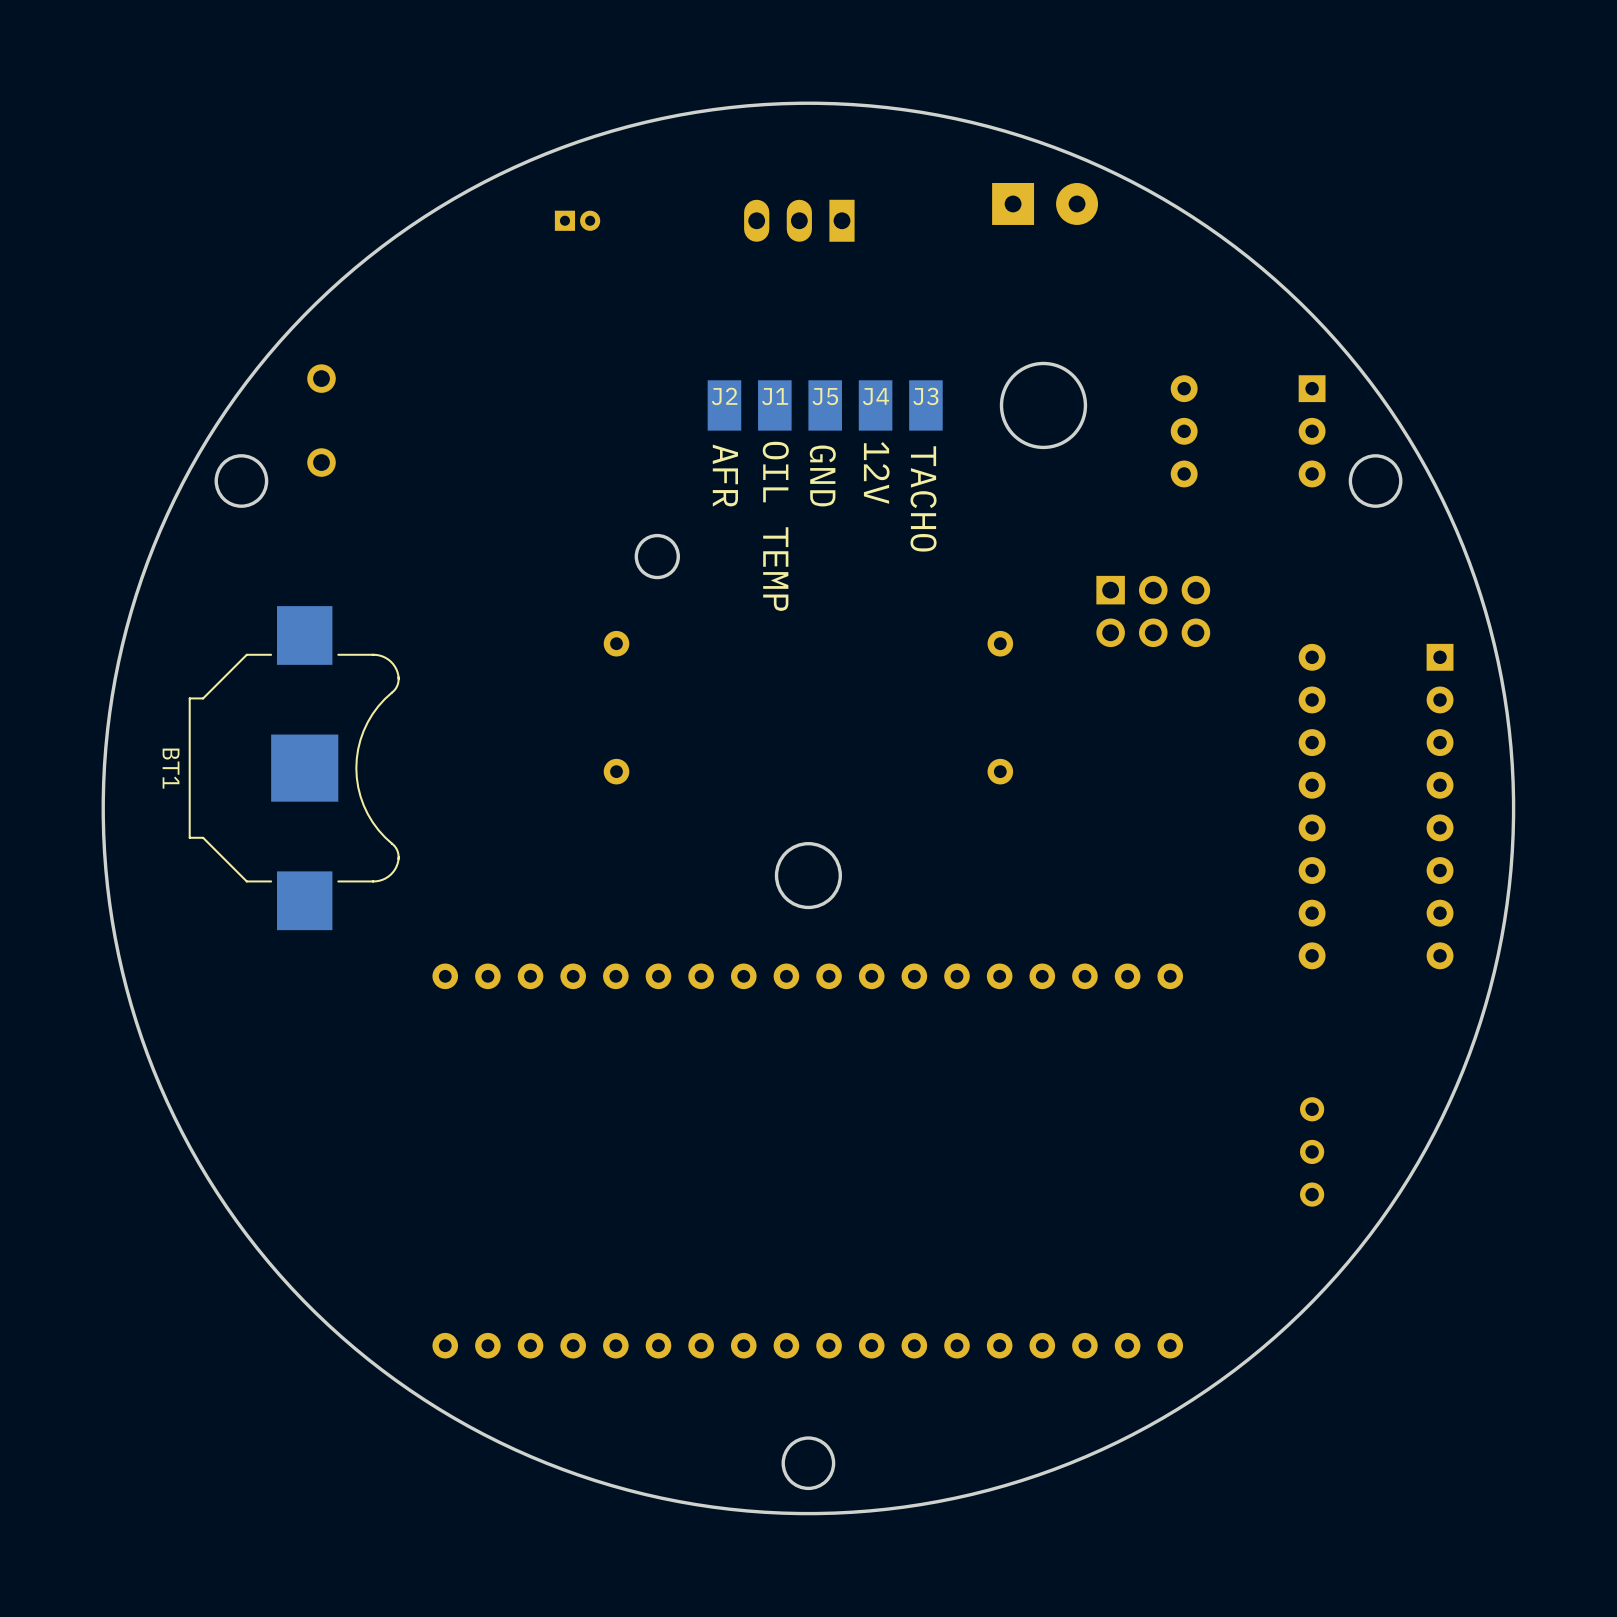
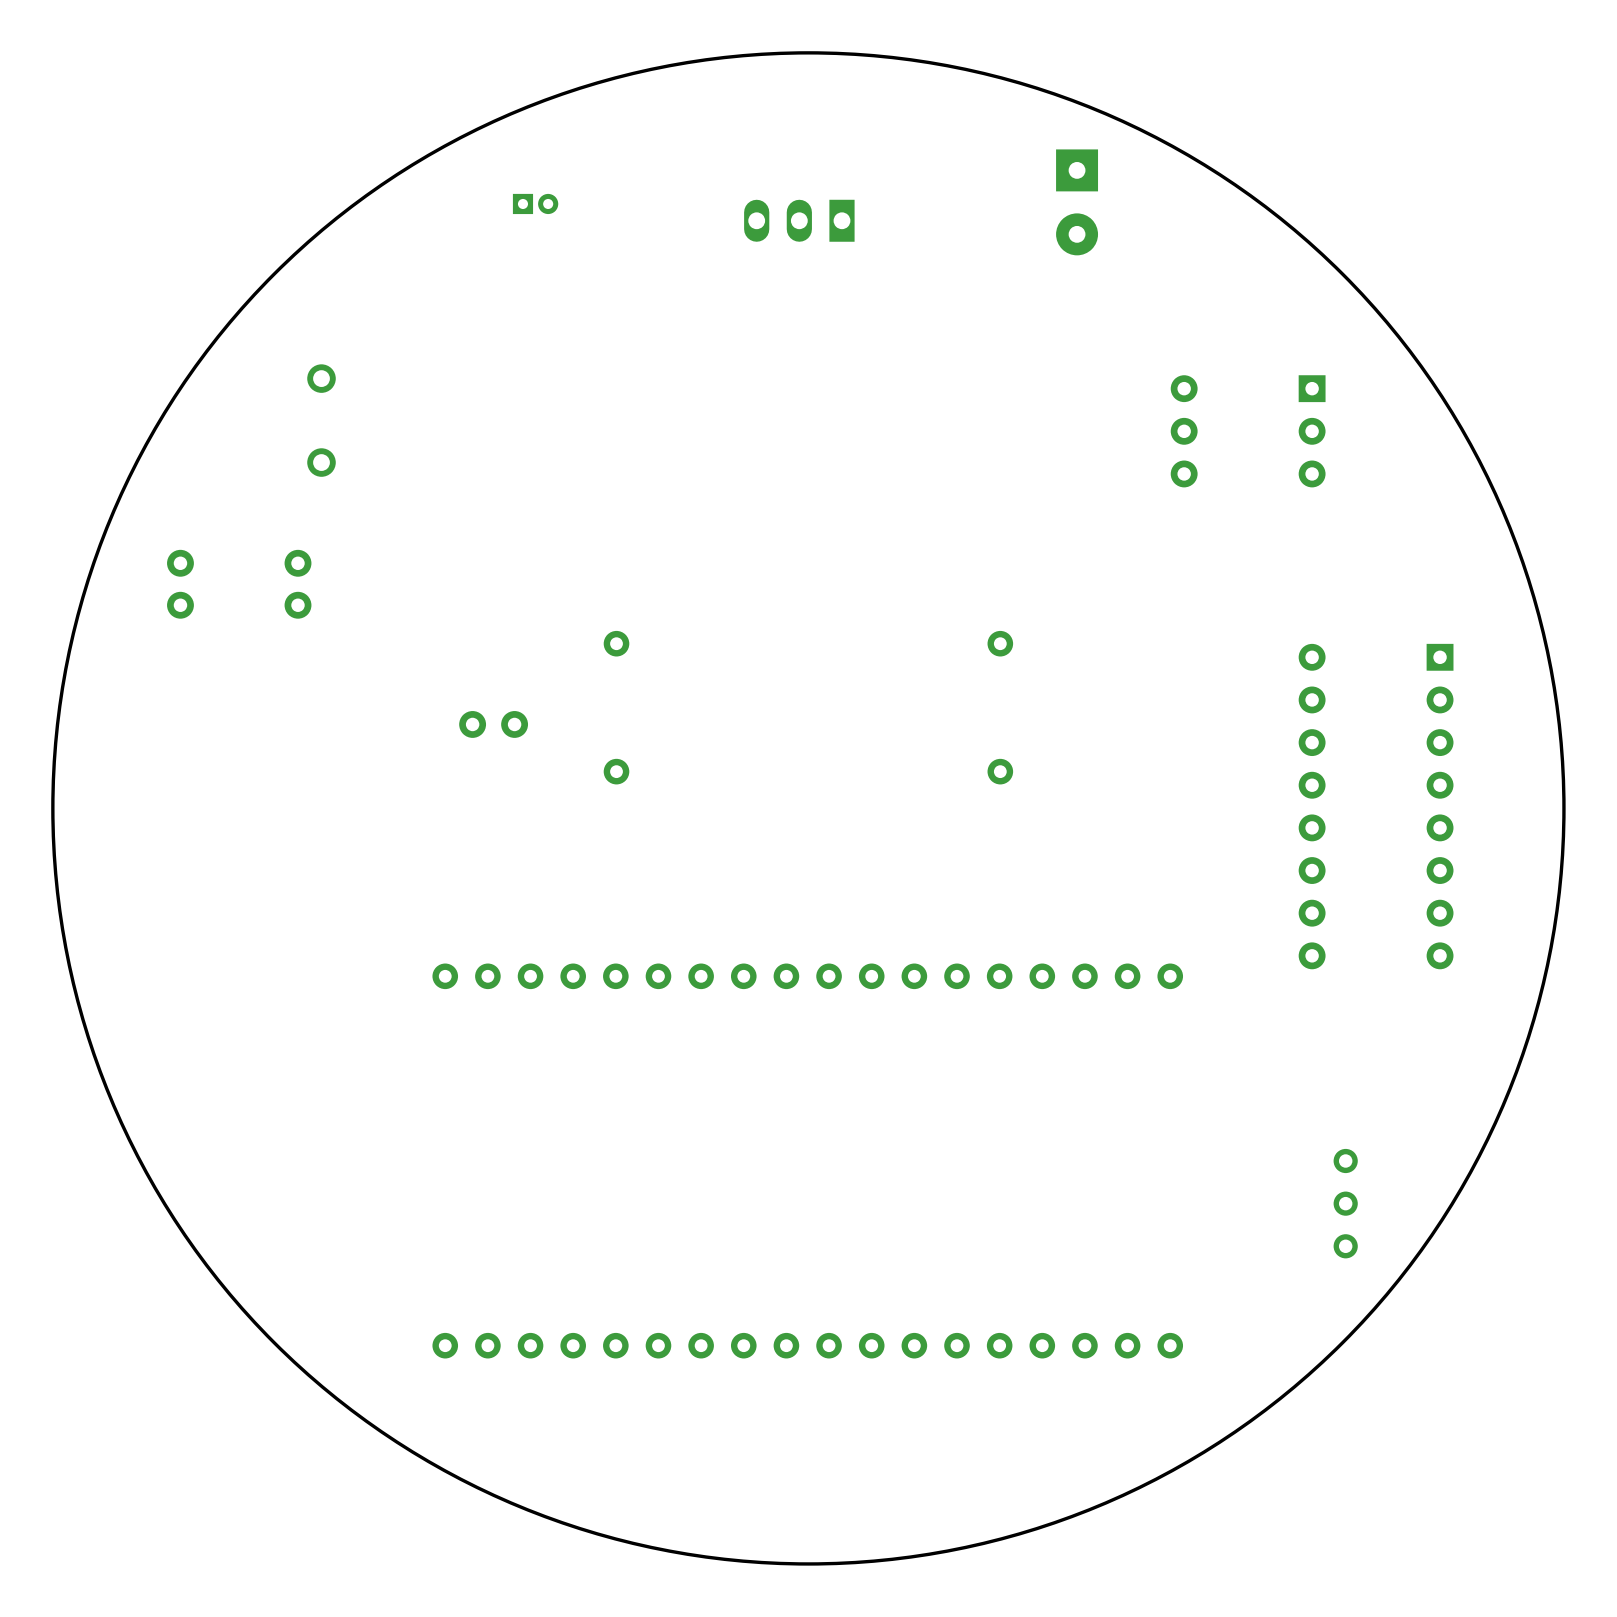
round board edge size: [101, 101, 1516, 1516] -> [51, 51, 1566, 1566]
part rotation: 0° (1045, 203) -> 90° clockwise (1077, 202)
part position: (577, 220) -> (535, 203)
round board edge: [999, 361, 1088, 450] -> none
J2: (724, 405) -> none
J1: (774, 405) -> none
J5: (825, 405) -> none
J4: (875, 405) -> none
J3: (925, 405) -> none
round board edge: [214, 454, 269, 508] -> none
round board edge: [1348, 454, 1403, 508] -> none
text: 12V (876, 472) -> none
text: AFR (725, 475) -> none
text: GND (822, 475) -> none
text: TACHO (923, 498) -> none
text: OIL TEMP (775, 526) -> none
round board edge: [634, 533, 680, 580] -> none
part: none -> (180, 584)
part: none -> (298, 584)
part: (1153, 611) -> none
part: none -> (493, 724)
BT1: (294, 768) -> none
round board edge: [774, 841, 842, 910] -> none
part position: (1312, 1151) -> (1345, 1203)
round board edge: [781, 1436, 836, 1491] -> none

